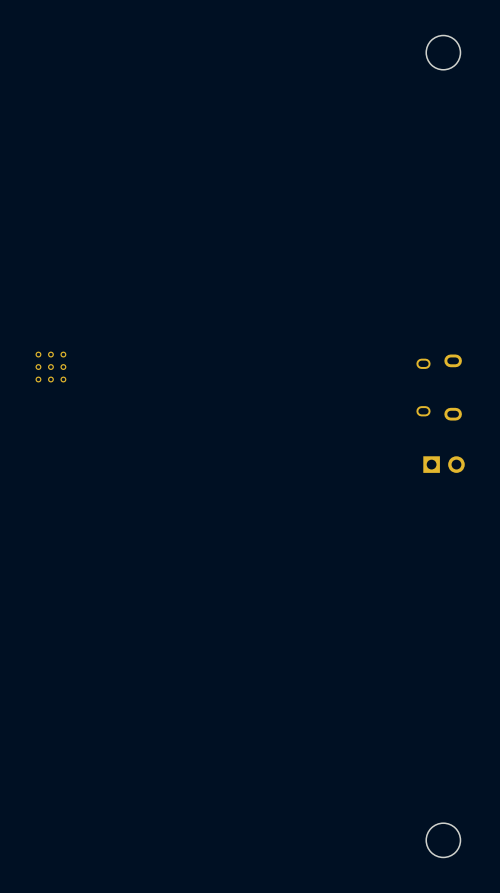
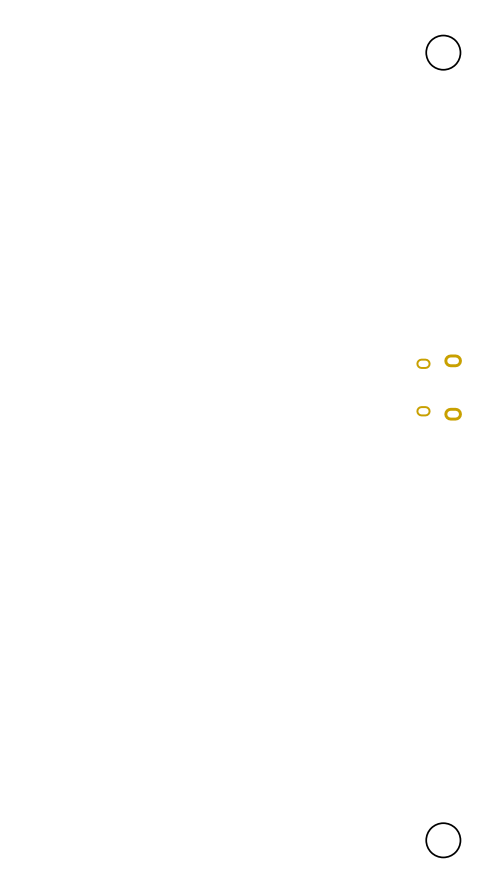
part: (50, 367) -> none
part: (444, 464) -> none

